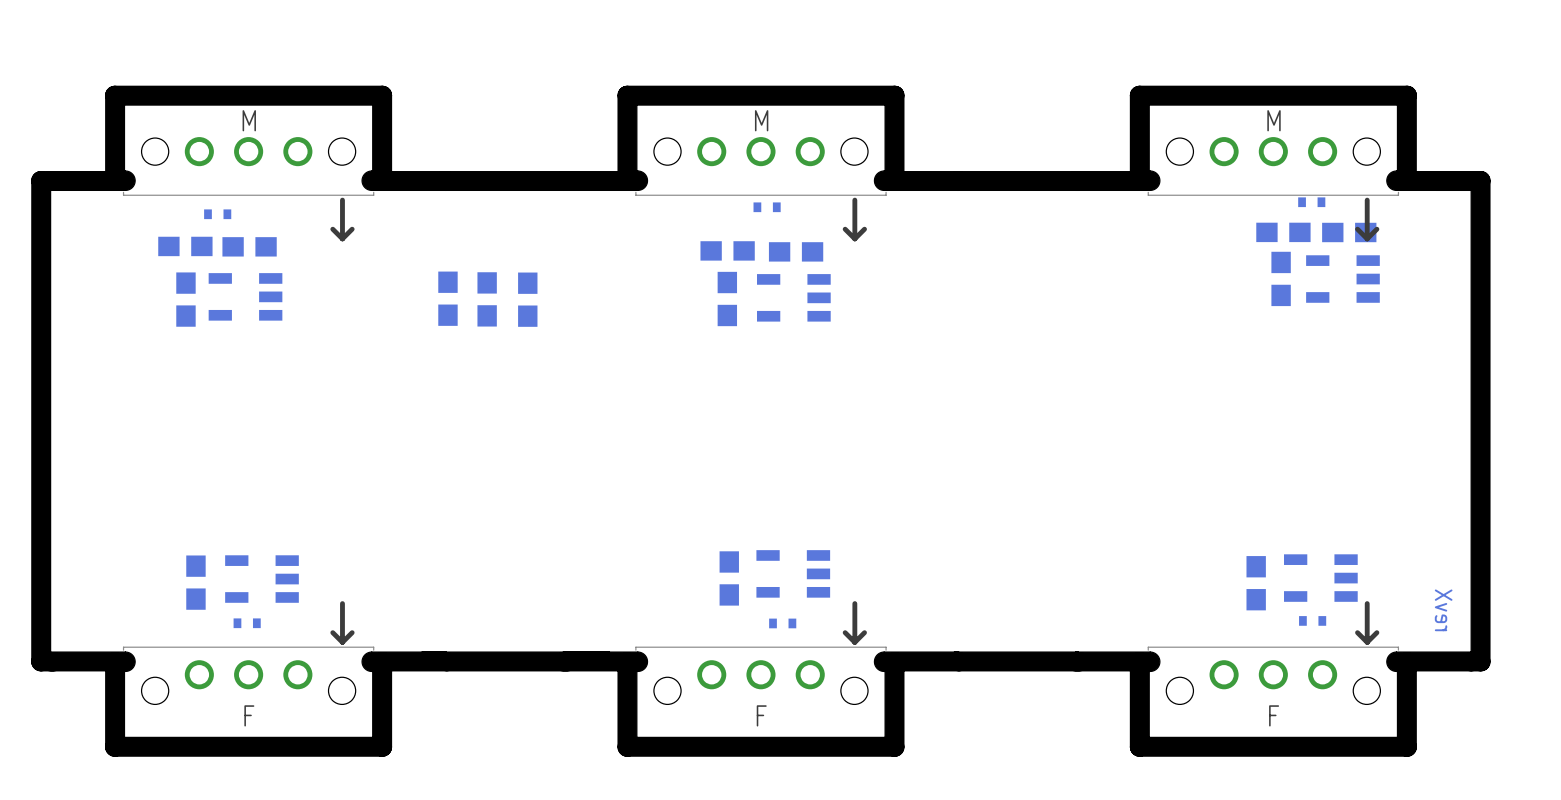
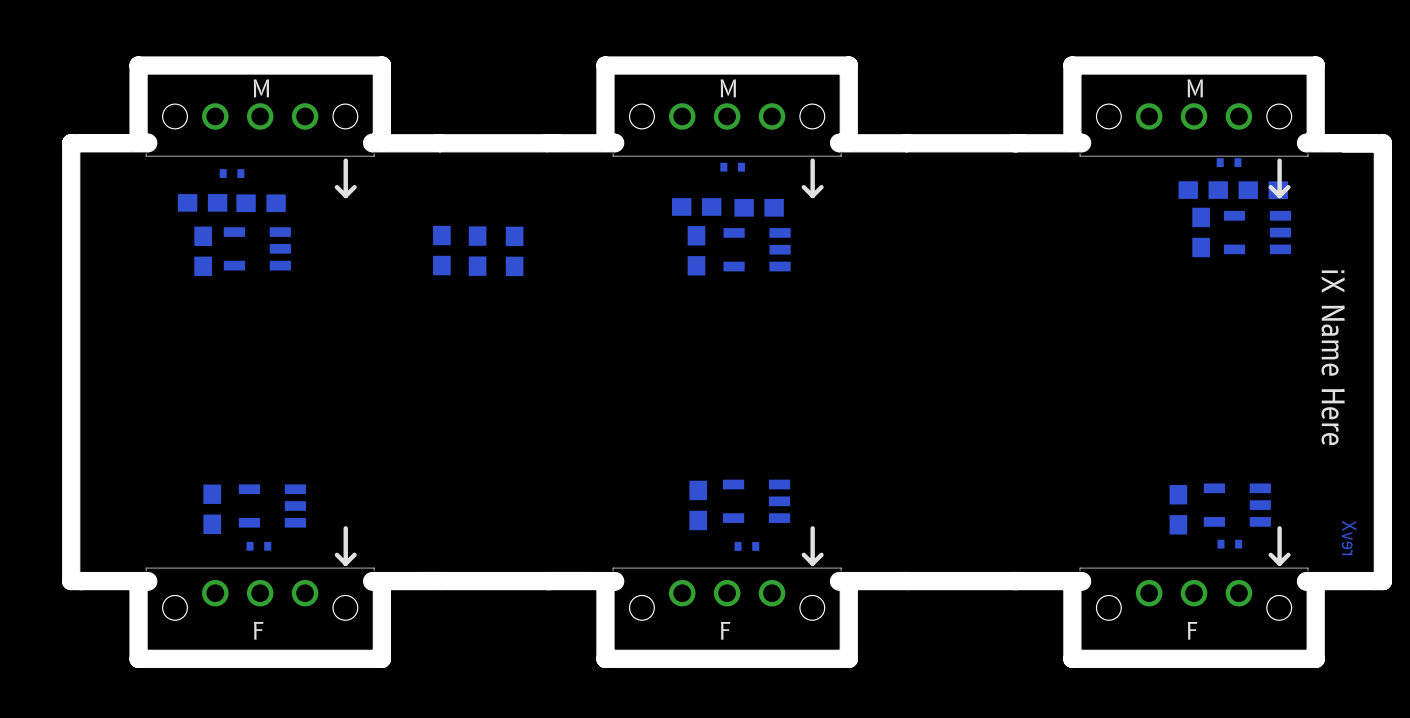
text: none -> iX Name Here (1333, 357)

